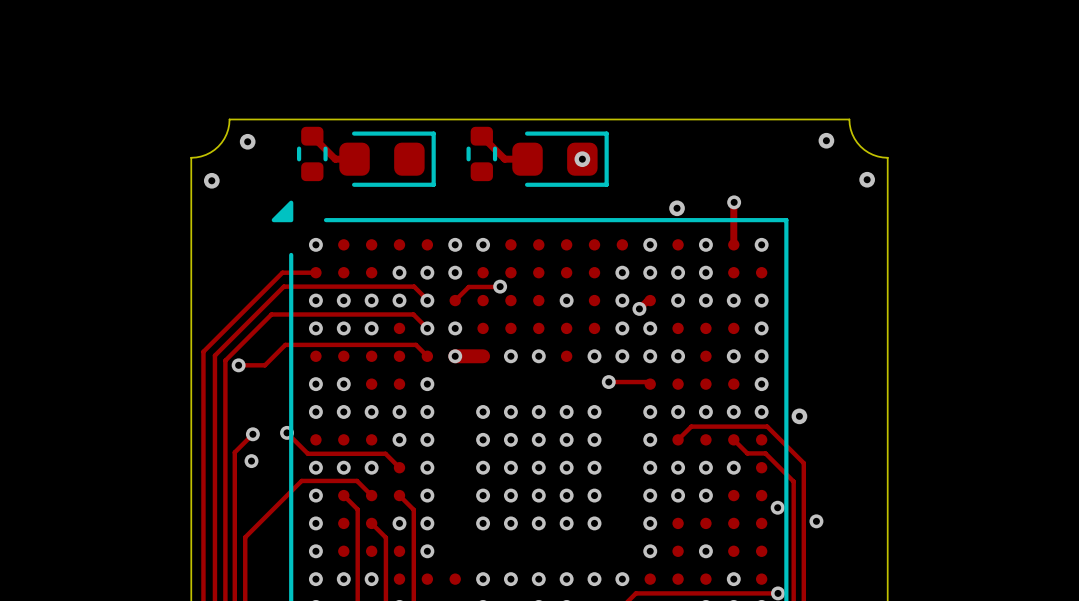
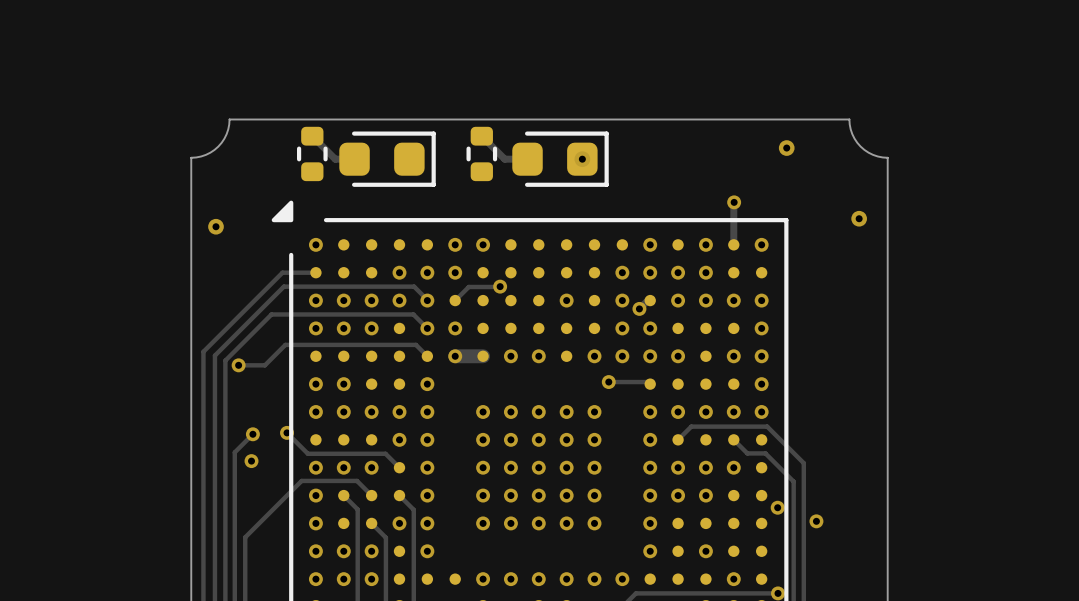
via position: (826, 140) -> (786, 148)
via: (247, 141) -> none
via position: (867, 179) -> (859, 218)
via: (211, 180) -> none
via: (677, 208) -> none
via: none -> (215, 226)
via: (799, 416) -> none
via: none -> (343, 551)
via: none -> (371, 551)

